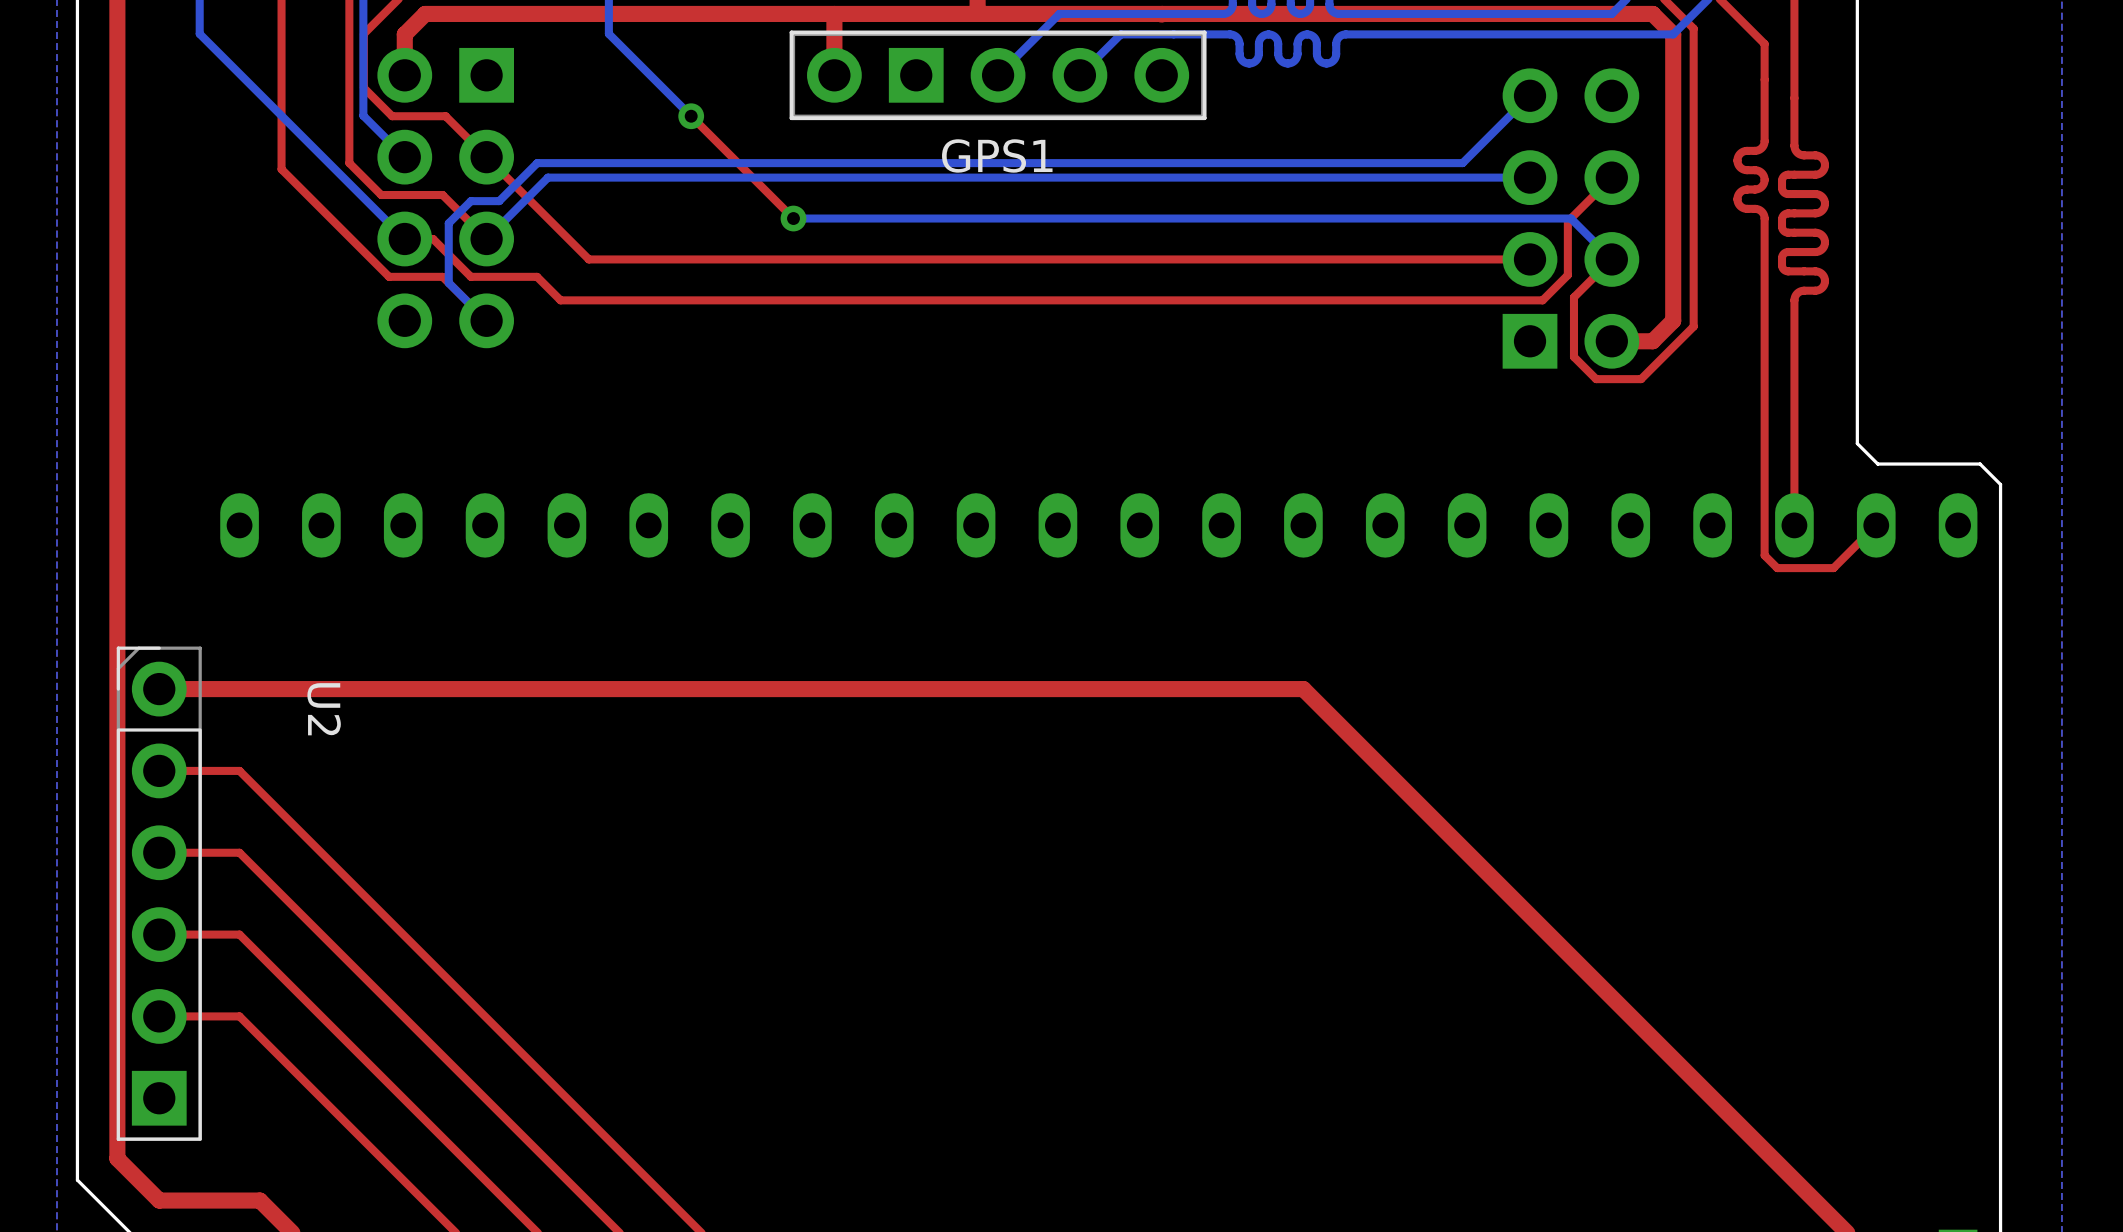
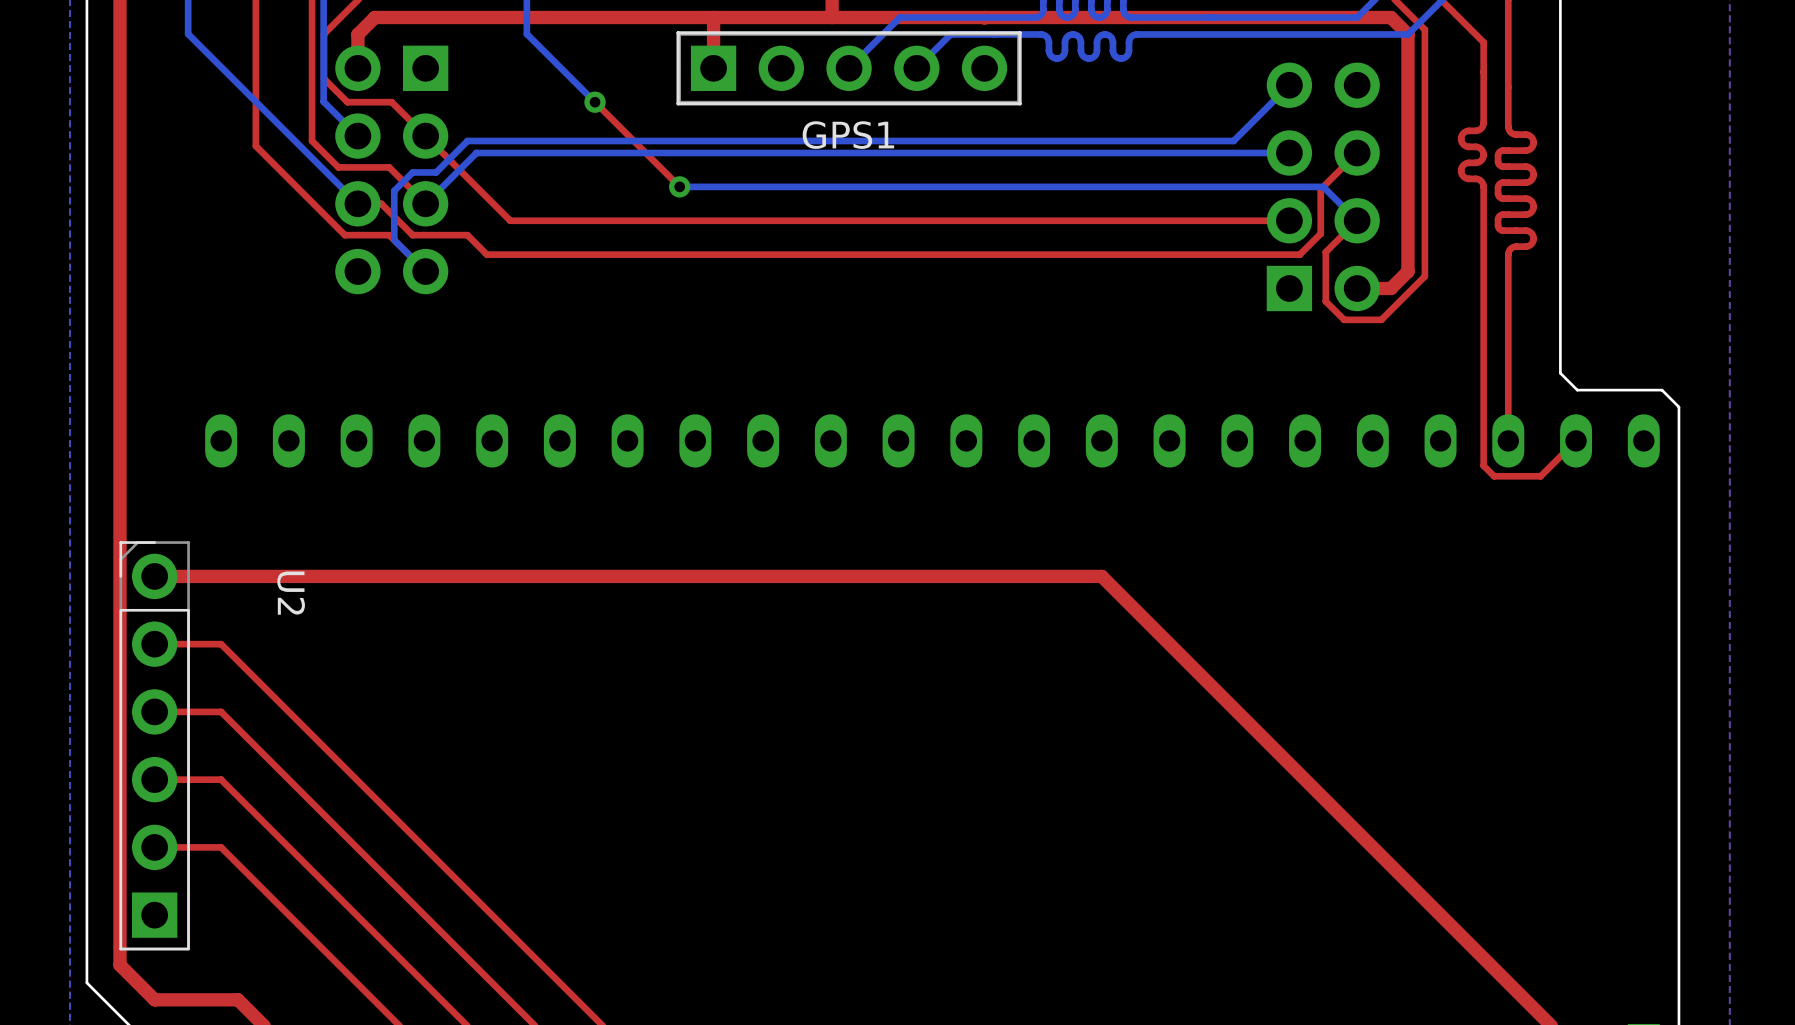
GPS1 footprint: [789, 30, 1207, 121] -> [676, 31, 1022, 106]

